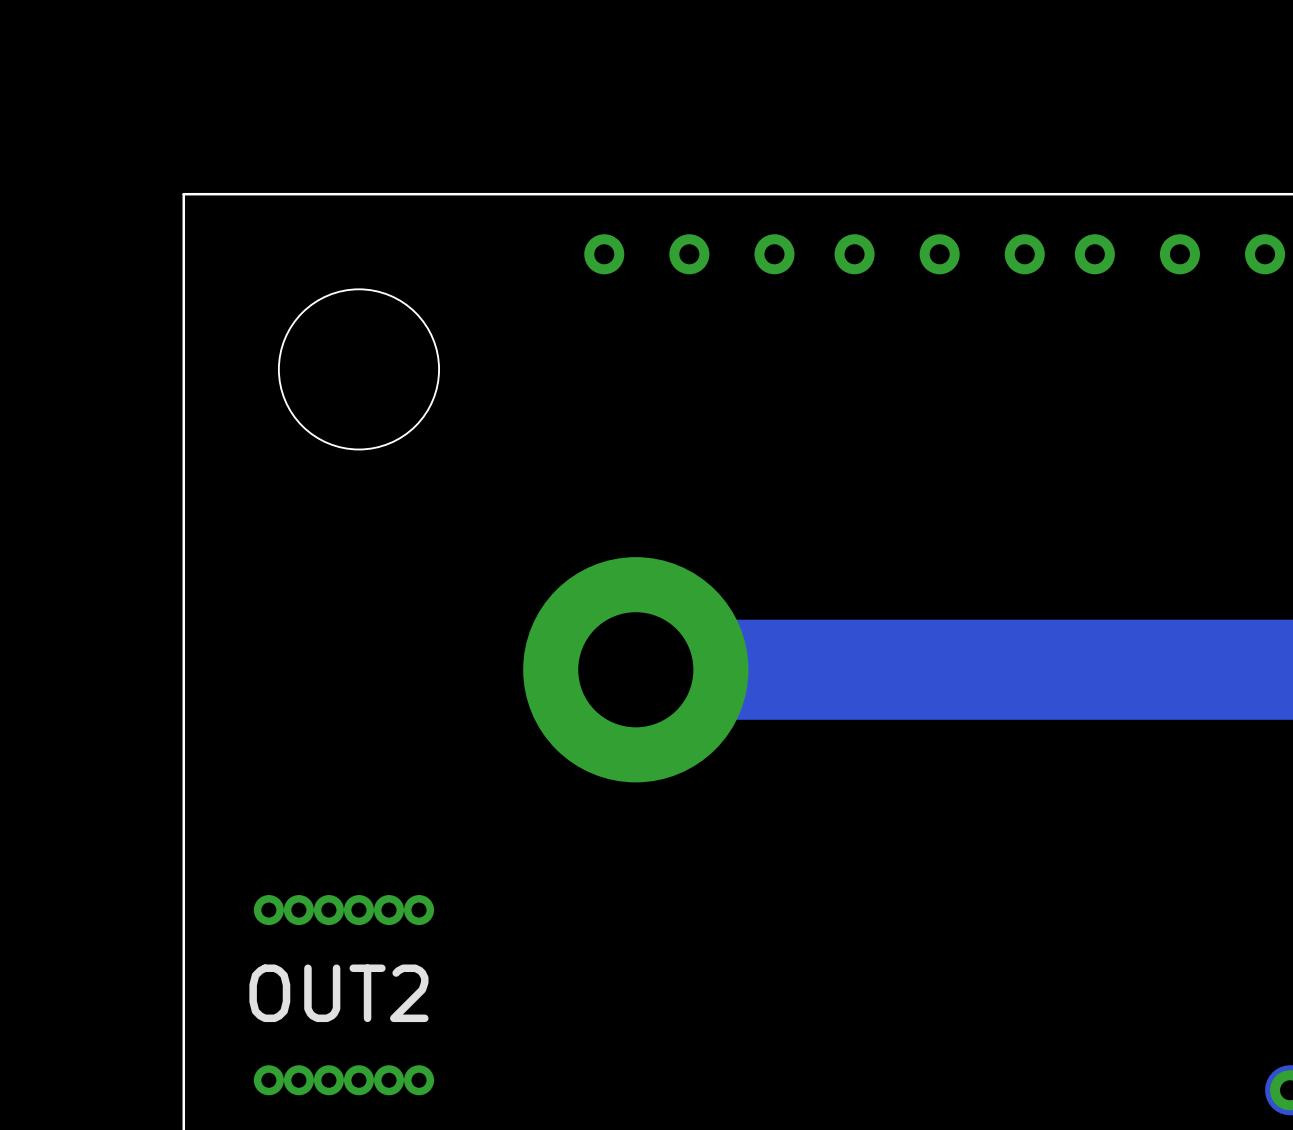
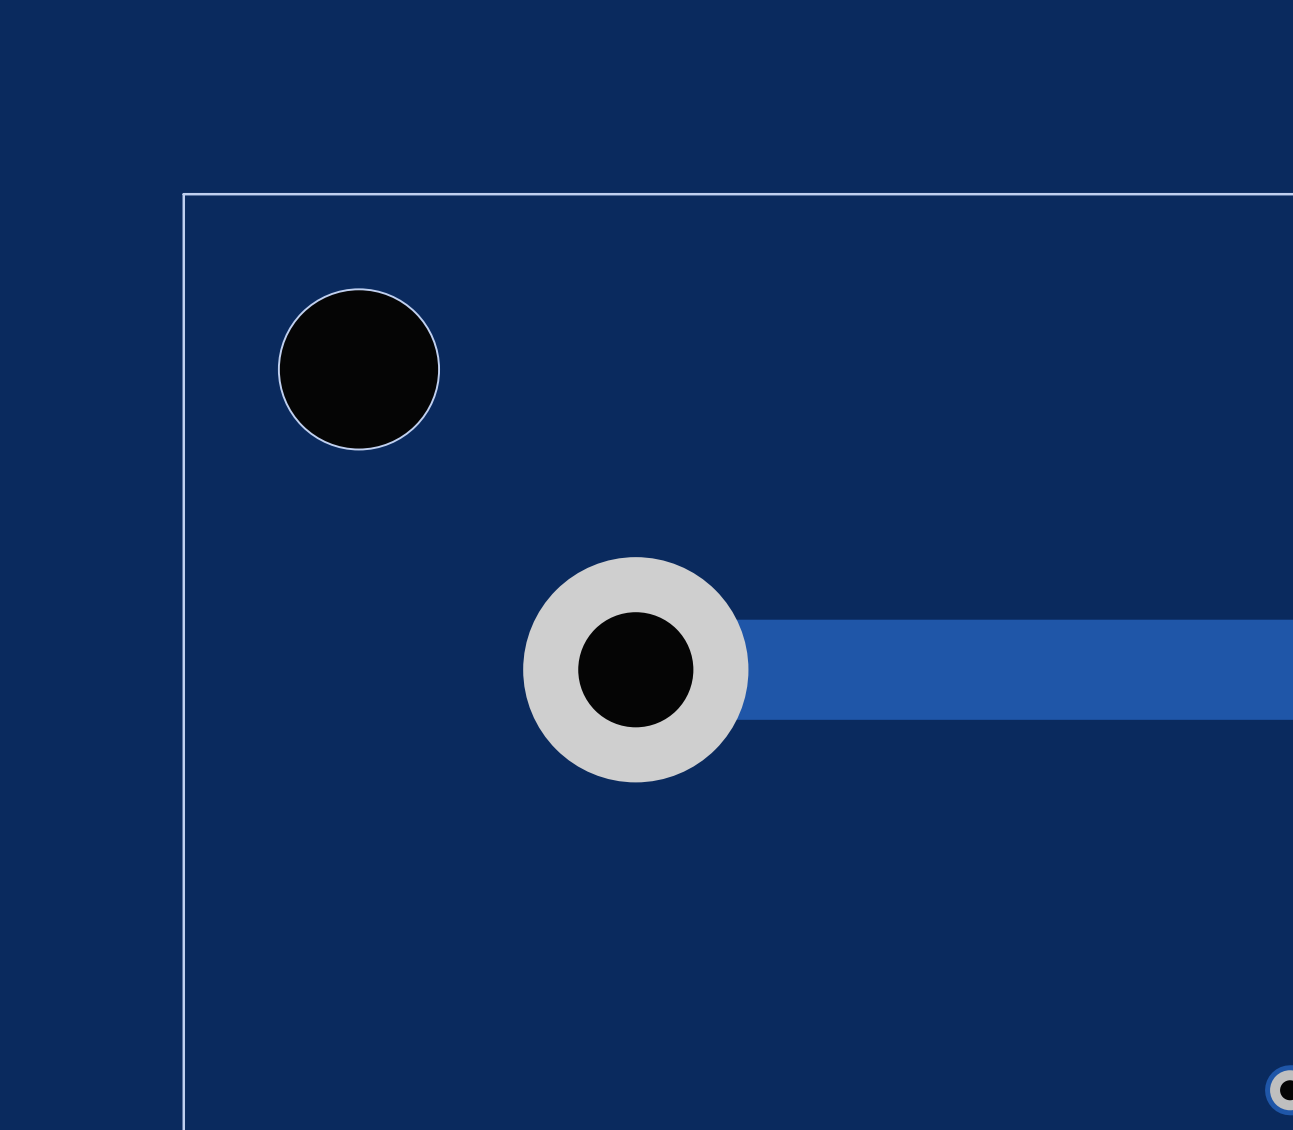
via: (604, 254) -> none
via: (689, 254) -> none
via: (774, 254) -> none
via: (854, 254) -> none
via: (939, 254) -> none
via: (1024, 254) -> none
via: (1094, 254) -> none
via: (1179, 254) -> none
via: (1265, 254) -> none
via: (268, 910) -> none
via: (298, 910) -> none
via: (328, 910) -> none
via: (358, 910) -> none
via: (389, 910) -> none
via: (419, 910) -> none
text: OUT2 (338, 993) -> none
via: (268, 1080) -> none
via: (298, 1080) -> none
via: (328, 1080) -> none
via: (358, 1080) -> none
via: (389, 1080) -> none
via: (419, 1080) -> none

